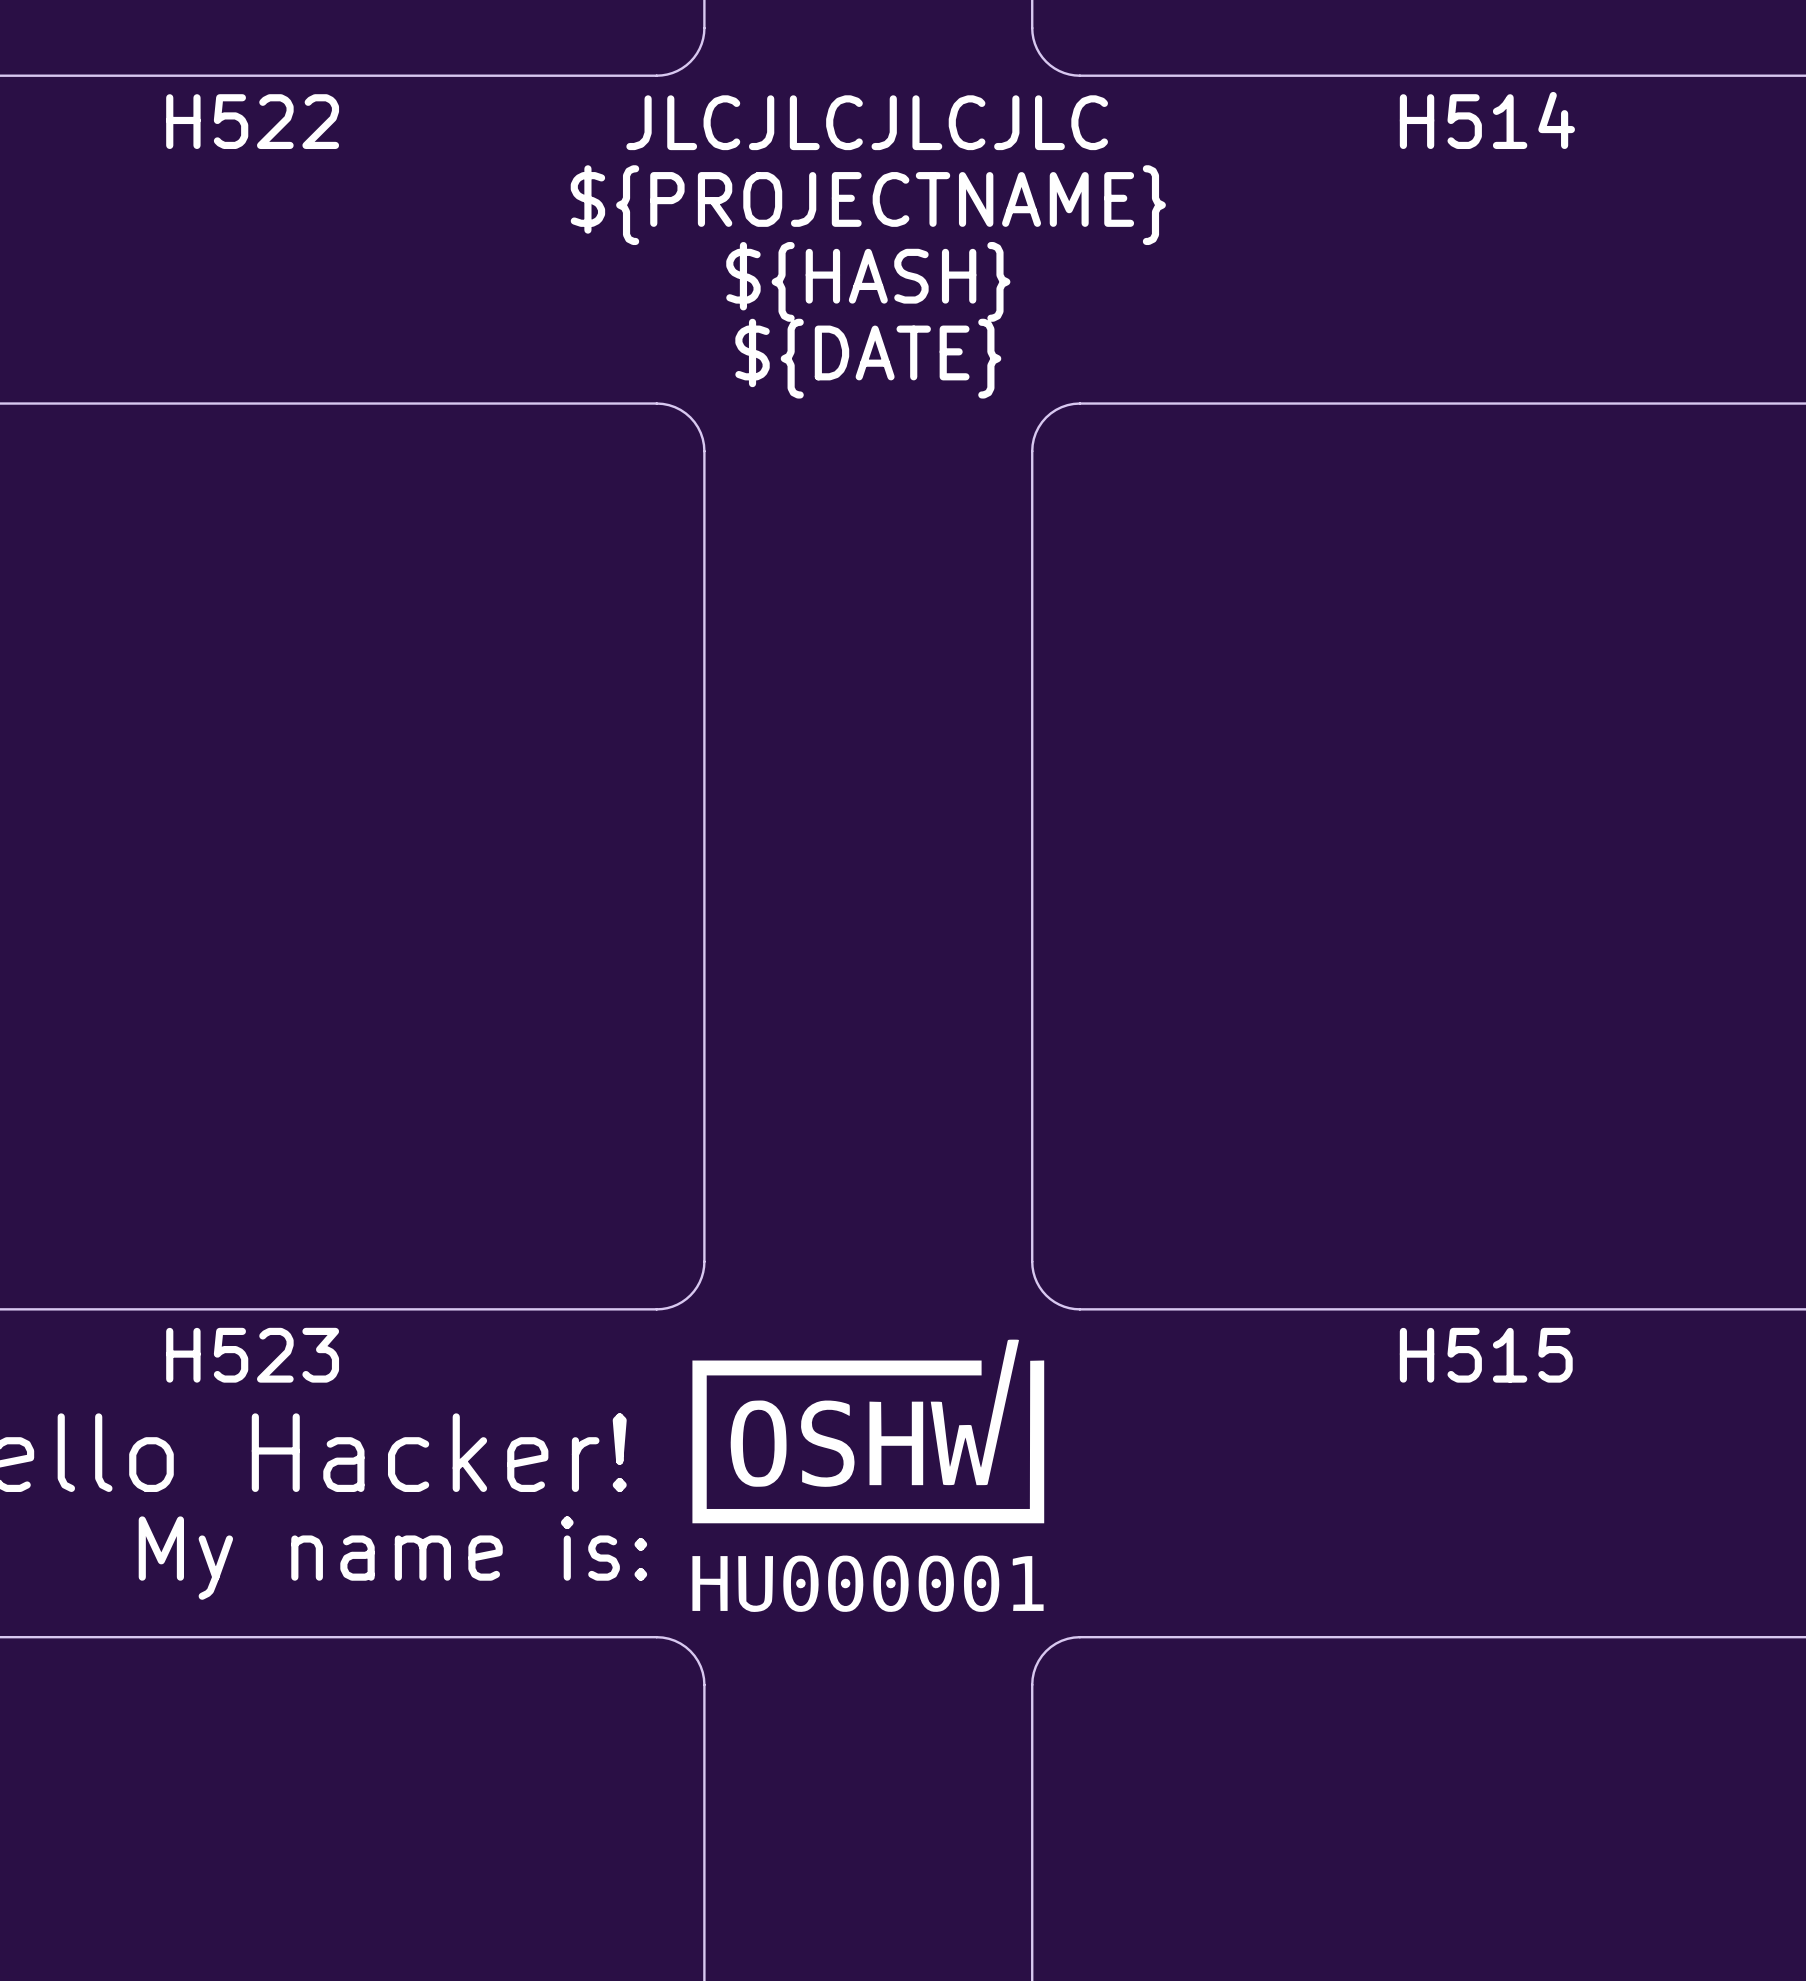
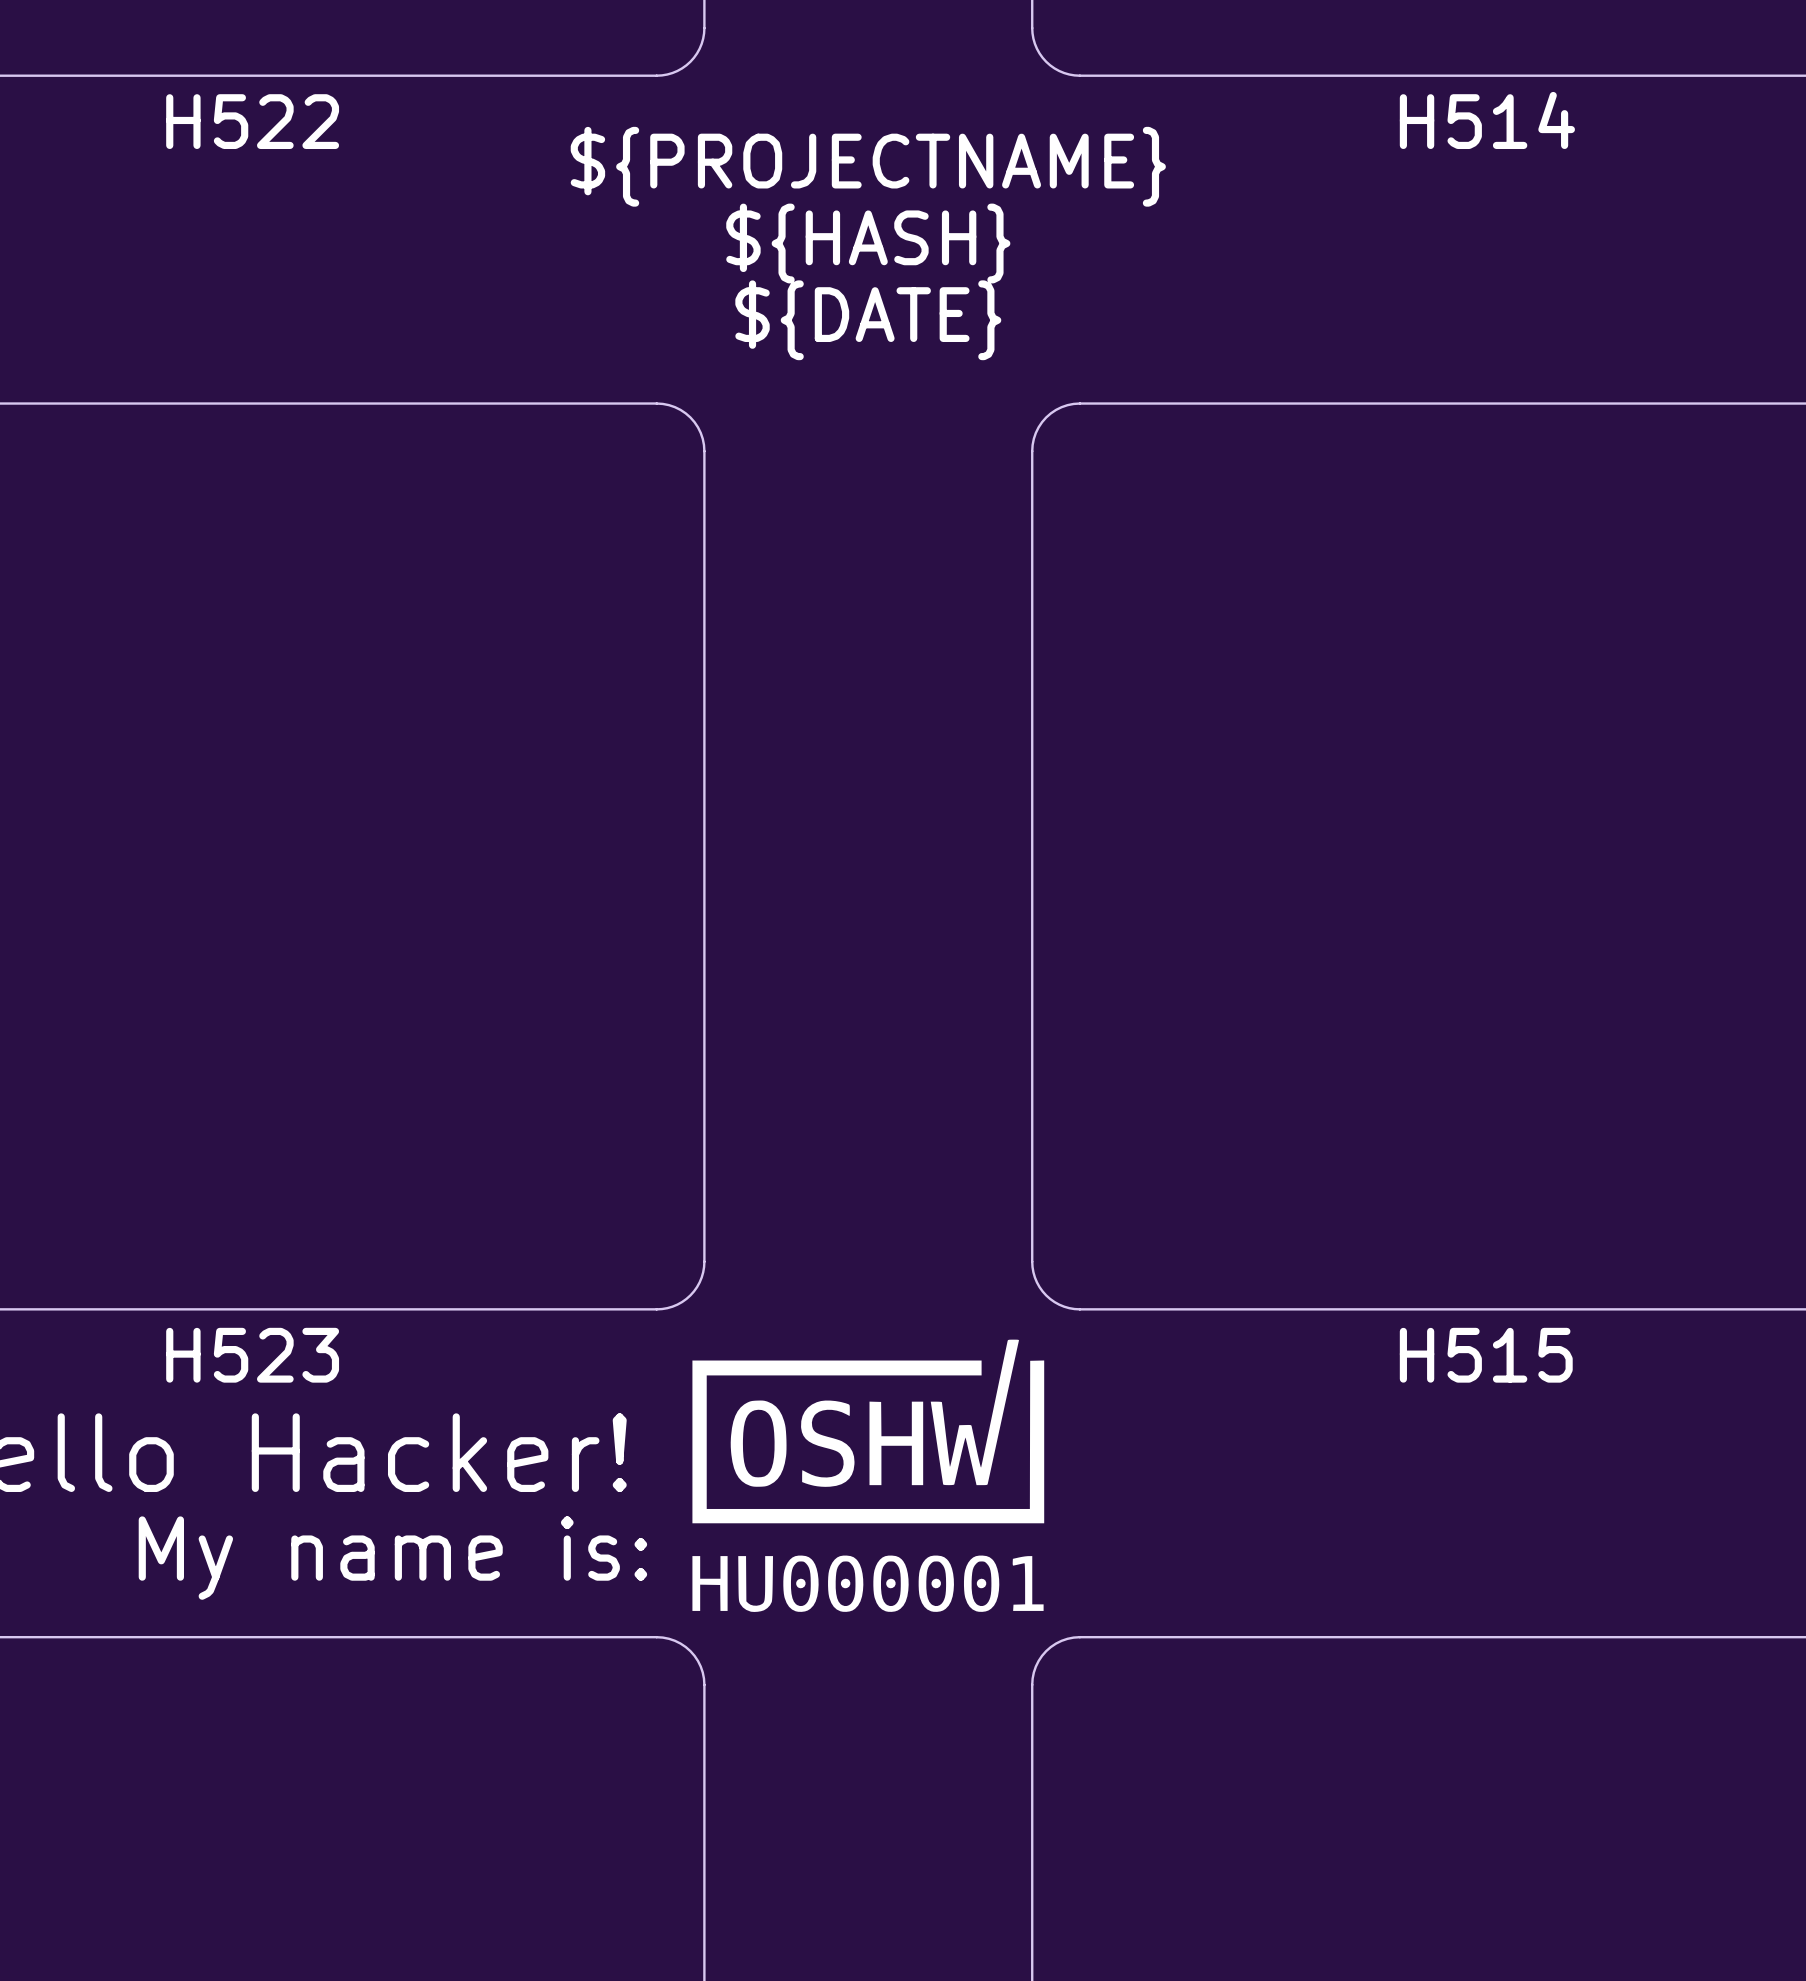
text: JLCJLCJLCJLC (867, 122) -> none
text position: ${PROJECTNAME} (868, 205) -> ${PROJECTNAME} (868, 166)
text position: ${HASH} (868, 281) -> ${HASH} (868, 243)
text position: ${DATE} (868, 358) -> ${DATE} (868, 320)

